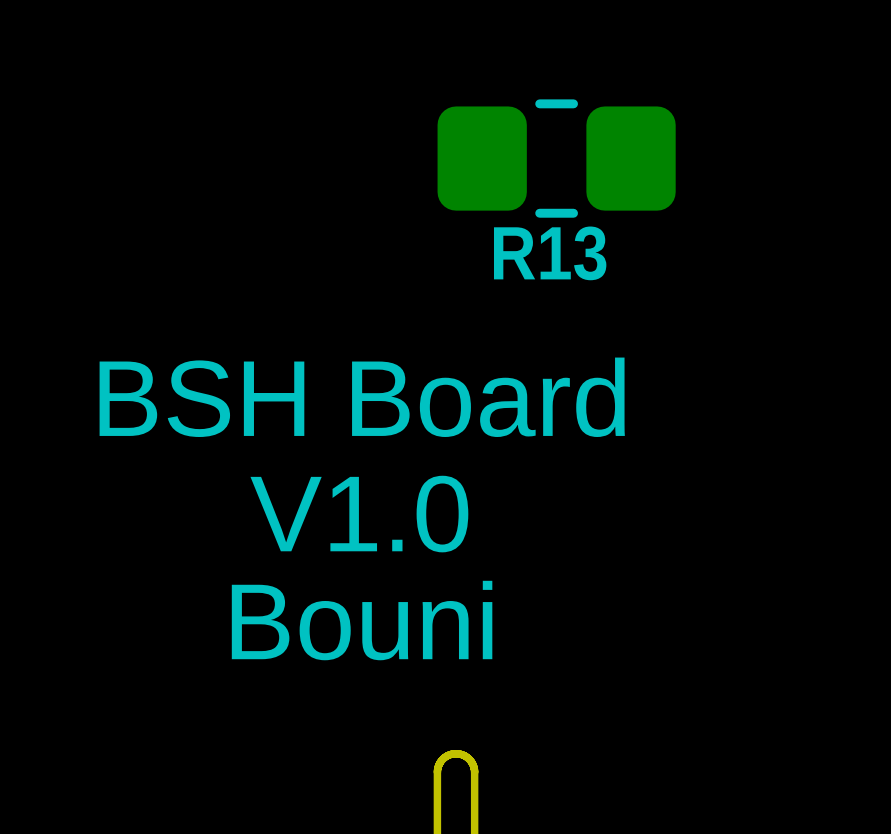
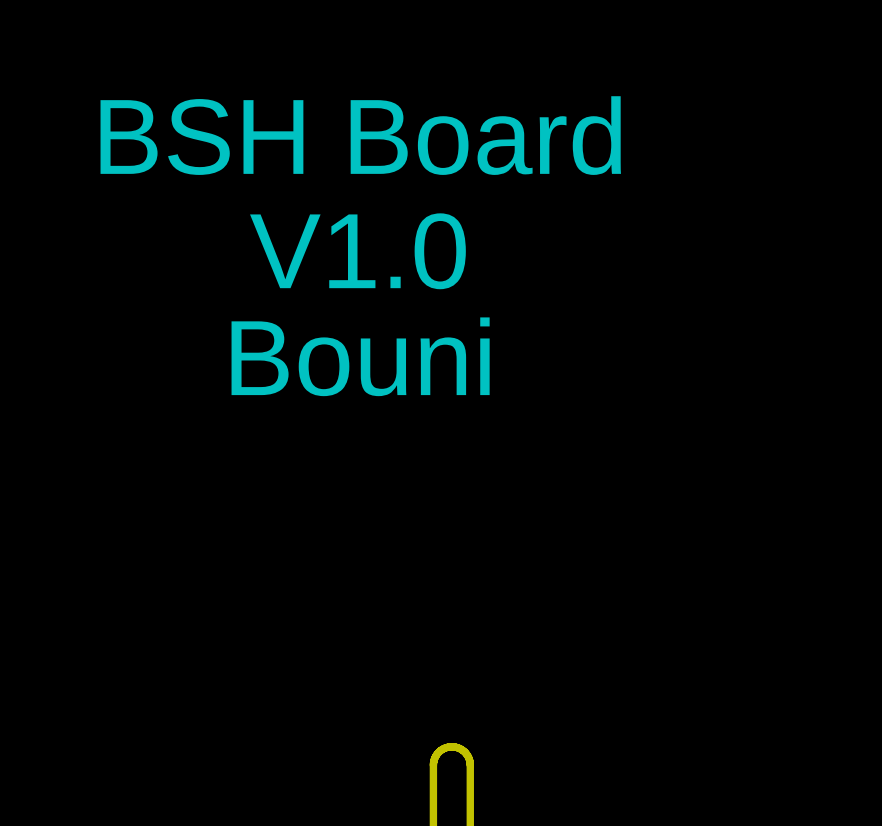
R13: (556, 158) -> none
text position: BSH Board (362, 397) -> BSH Board (360, 135)
text position: V1.0 (359, 514) -> V1.0 (357, 251)
text position: Bouni (362, 620) -> Bouni (360, 356)

